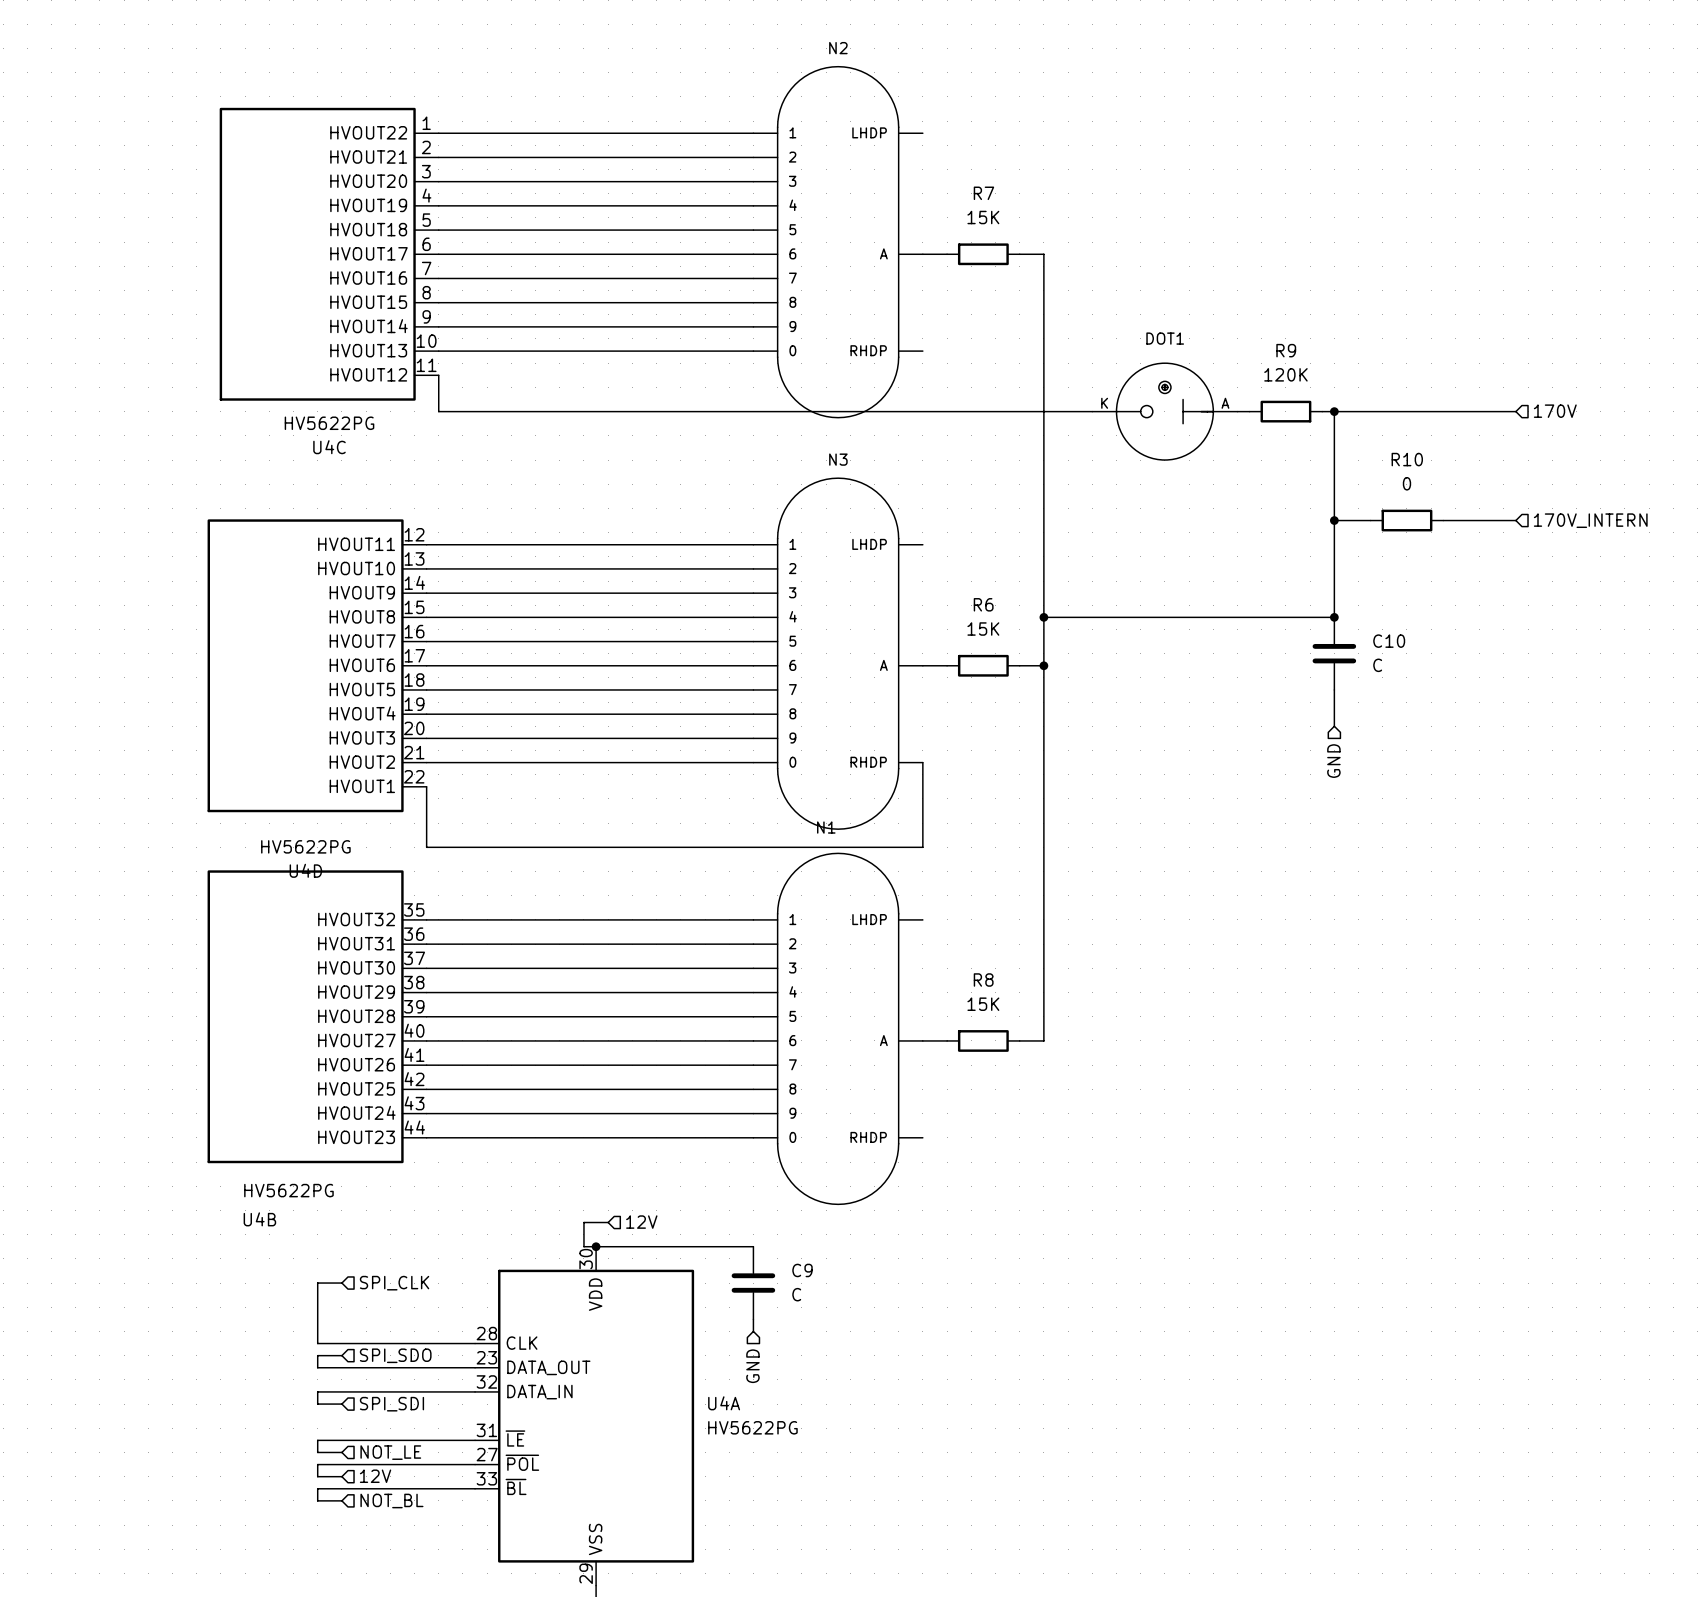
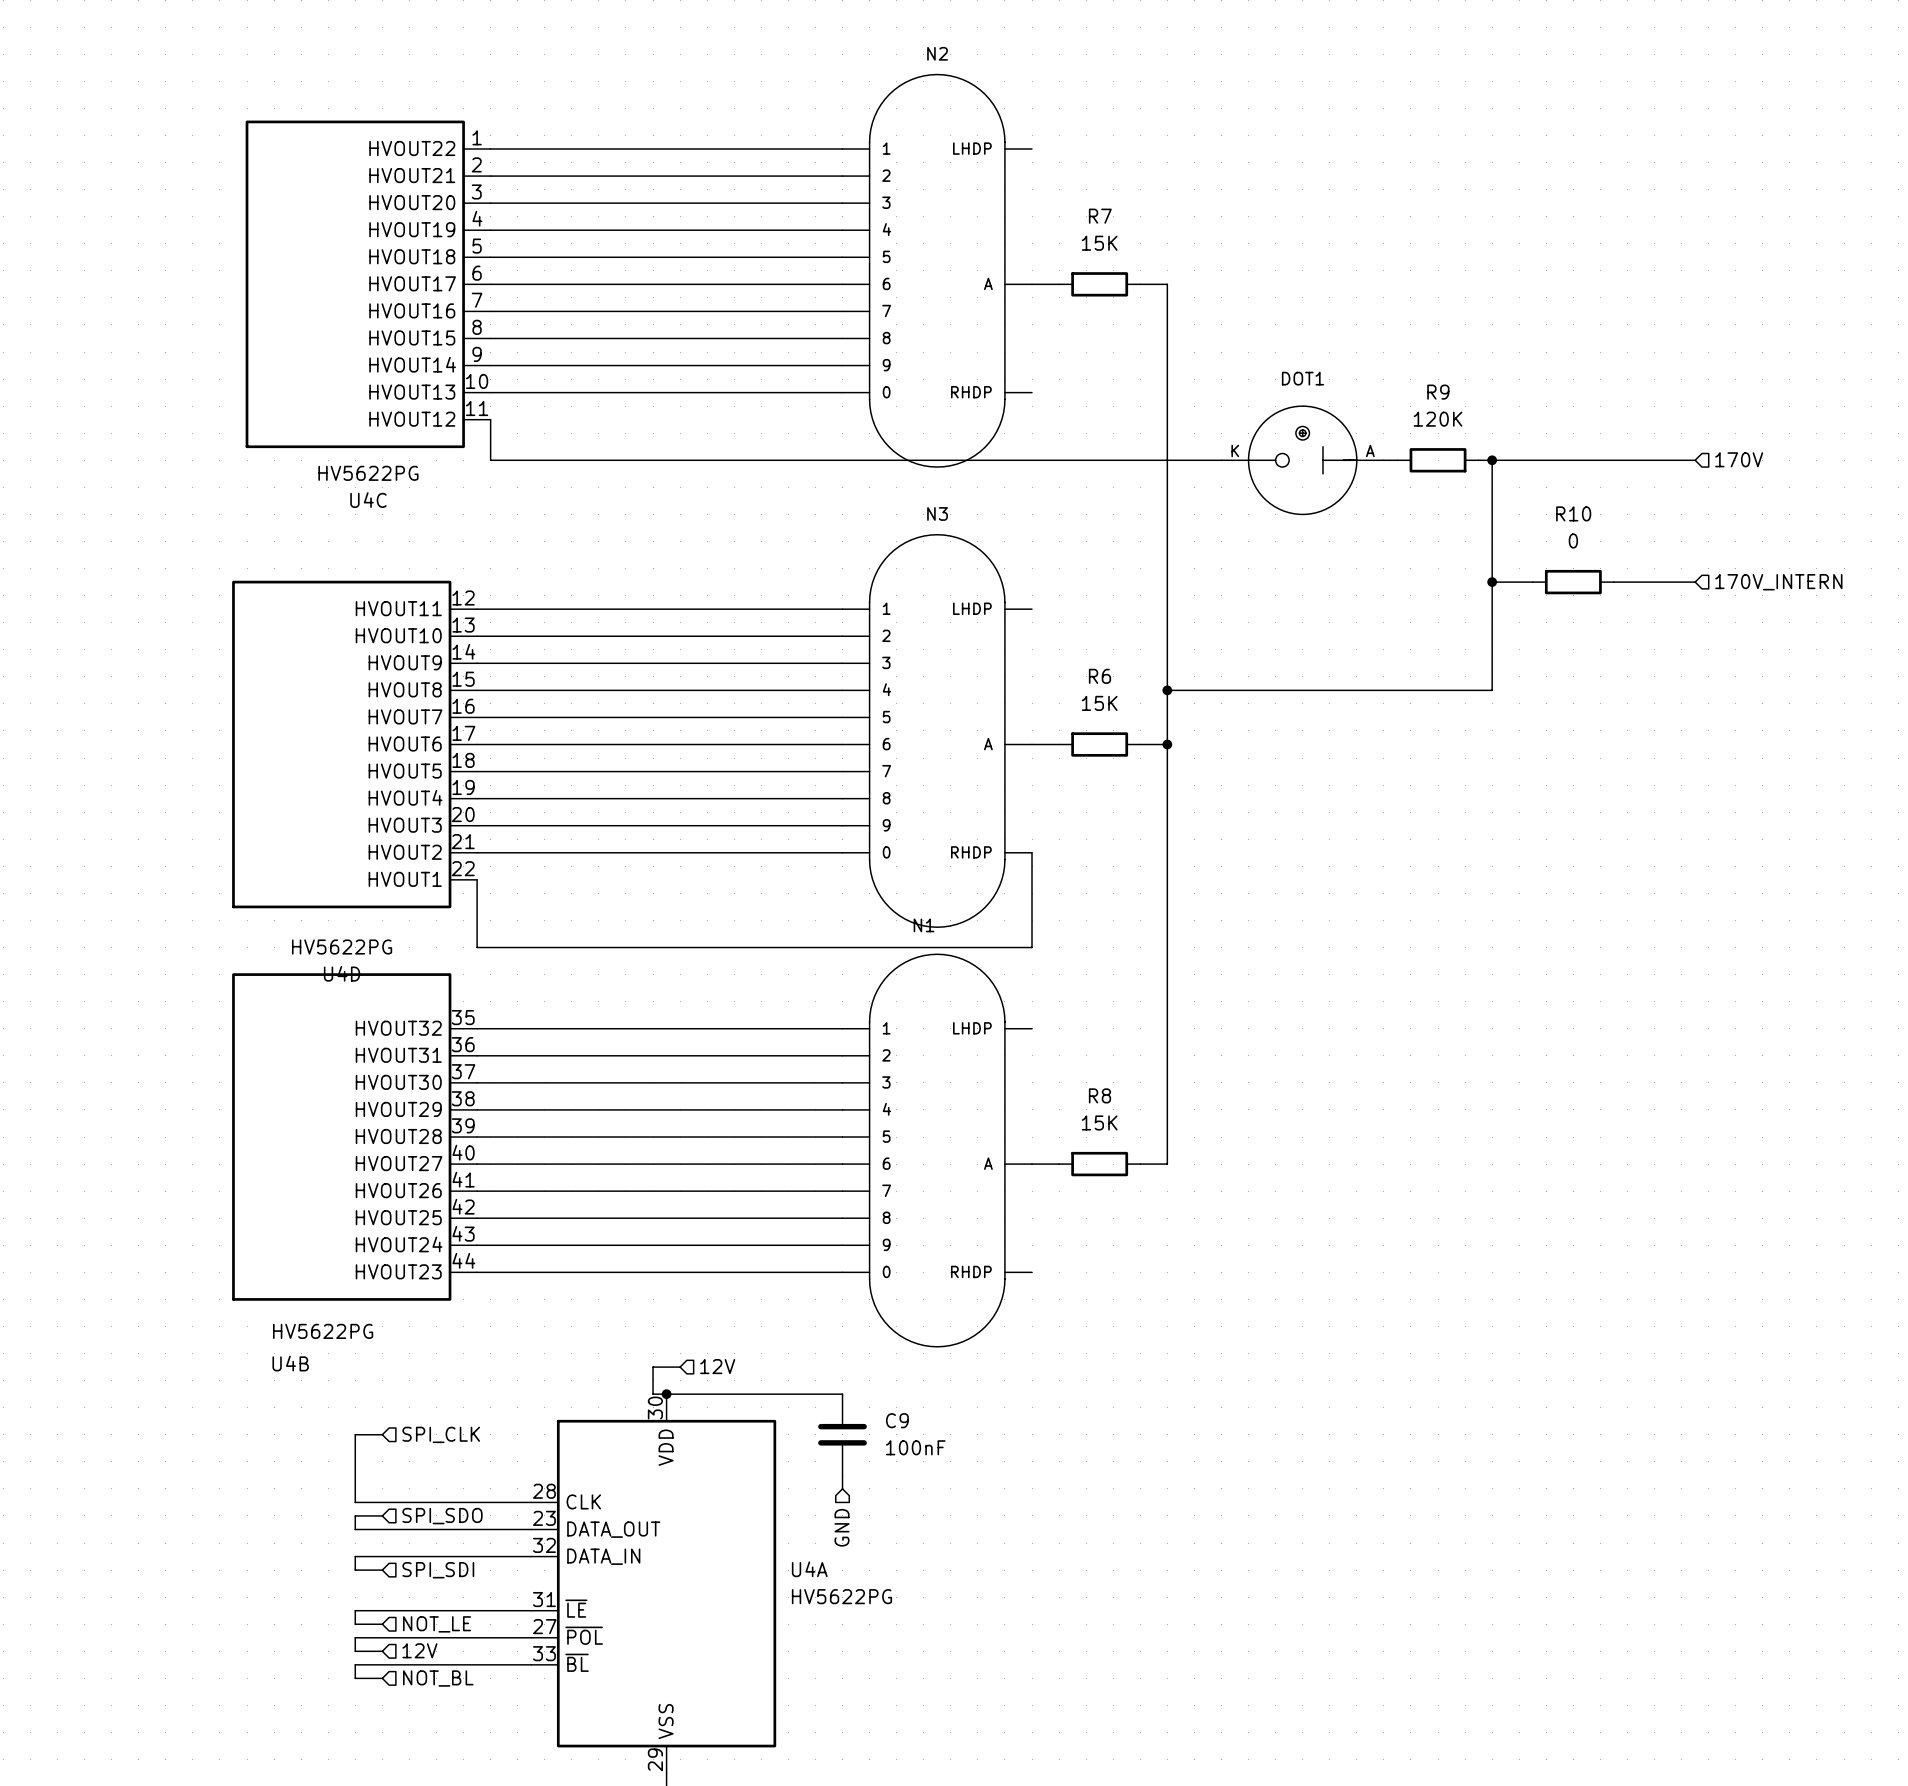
junction: (1334, 617) -> none
C10: C (1334, 653) -> none
wire: (1334, 689) (1334, 726) -> none
hierarchical label: GND (1333, 761) -> none
C9 value: C (796, 1294) -> 100nF (915, 1447)

